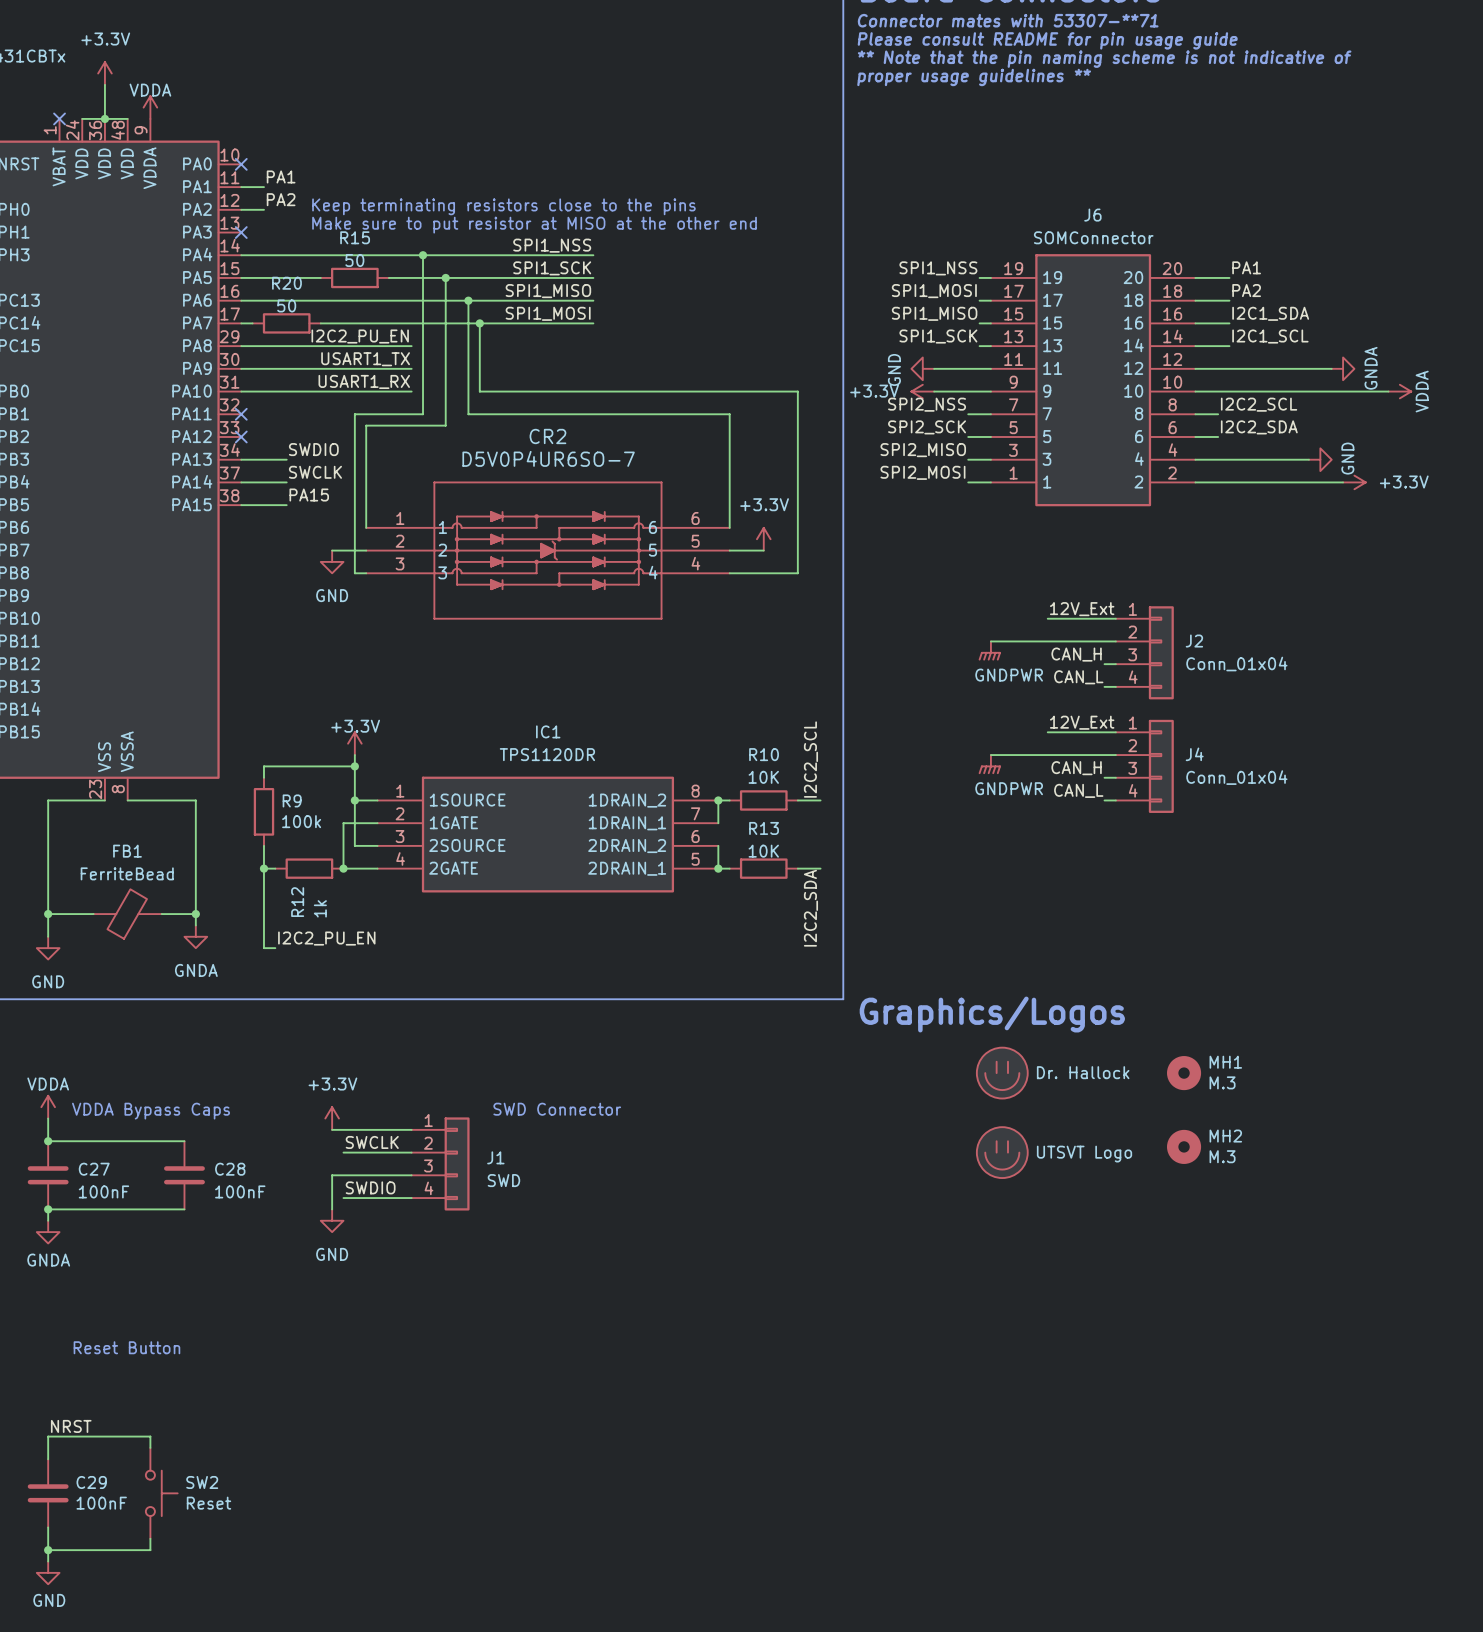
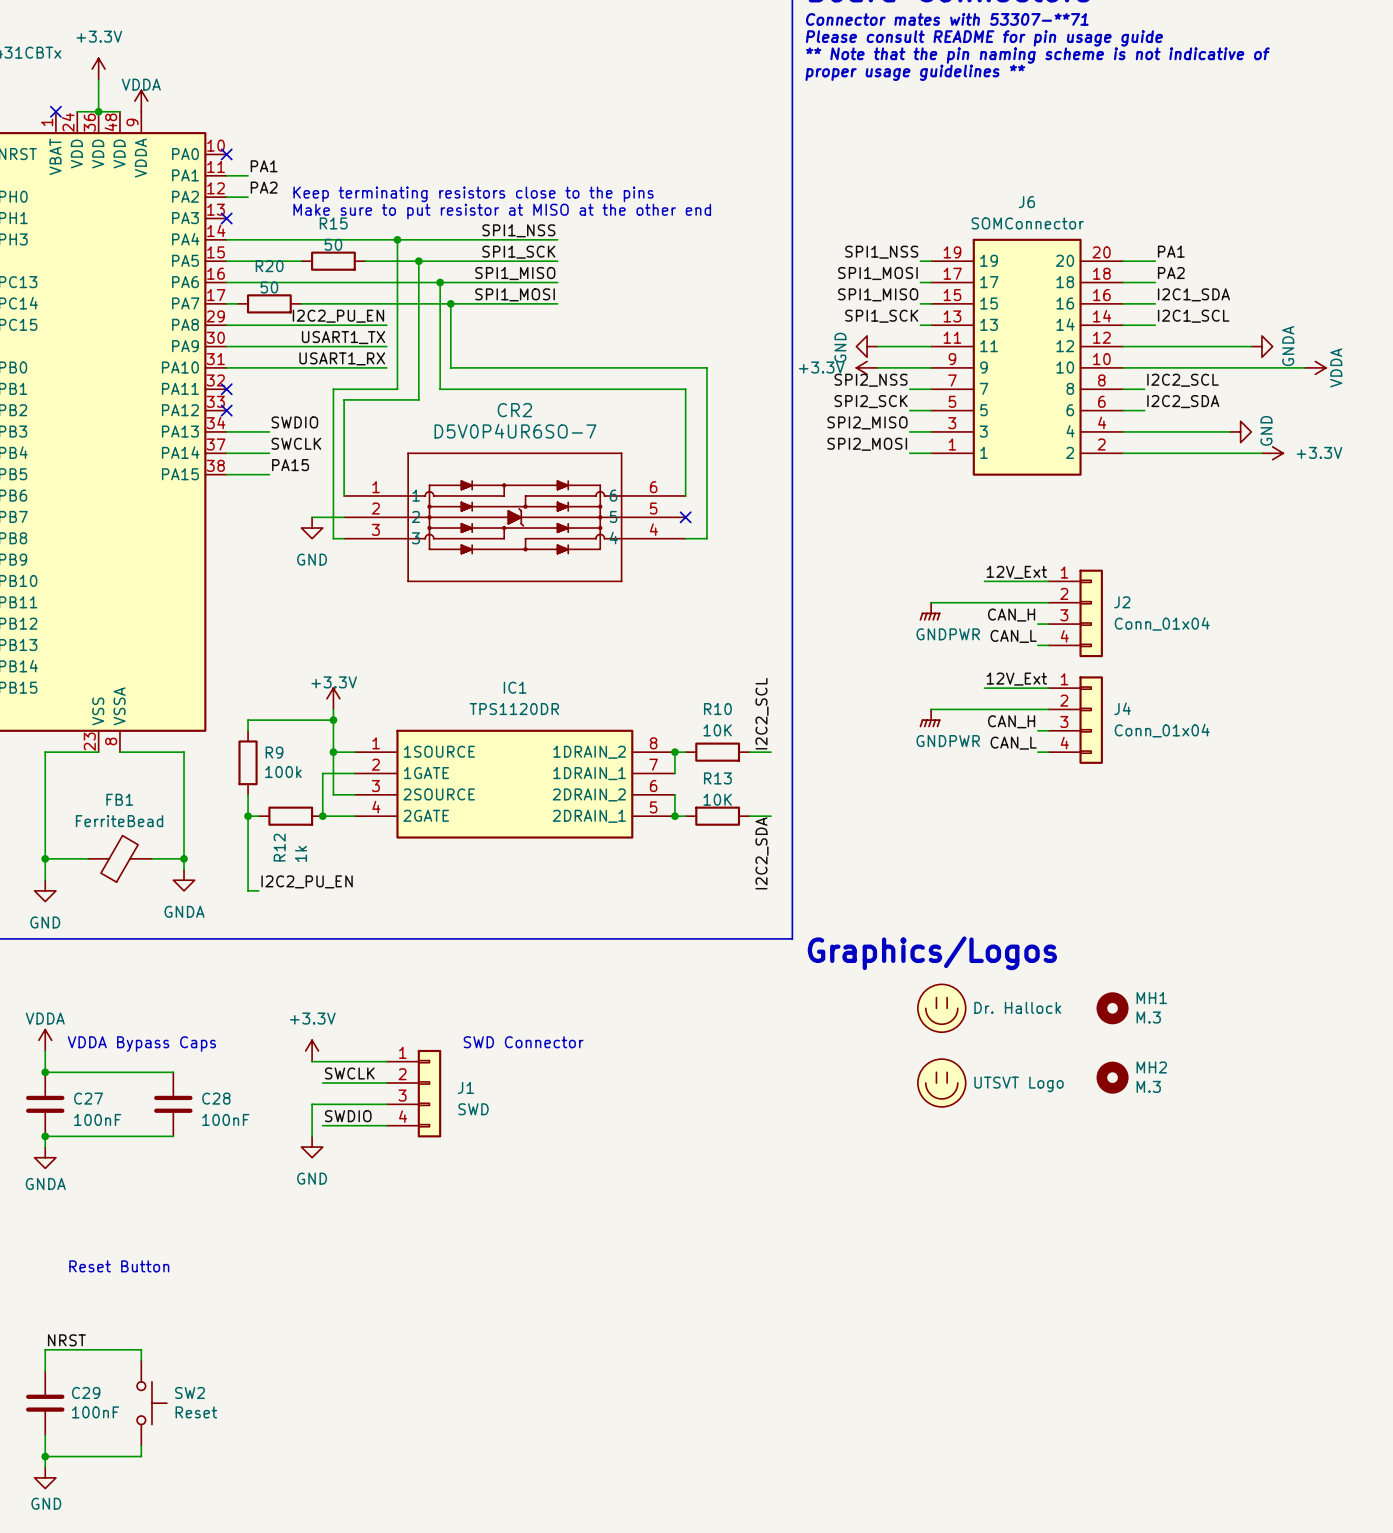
wire: (752, 391) (797, 391) (797, 573) (752, 573) -> (706, 367) (706, 538)
power symbol: +3.3V (763, 539) -> none
wire: (729, 550) (763, 550) -> none
no-connect mark: none -> (685, 517)

